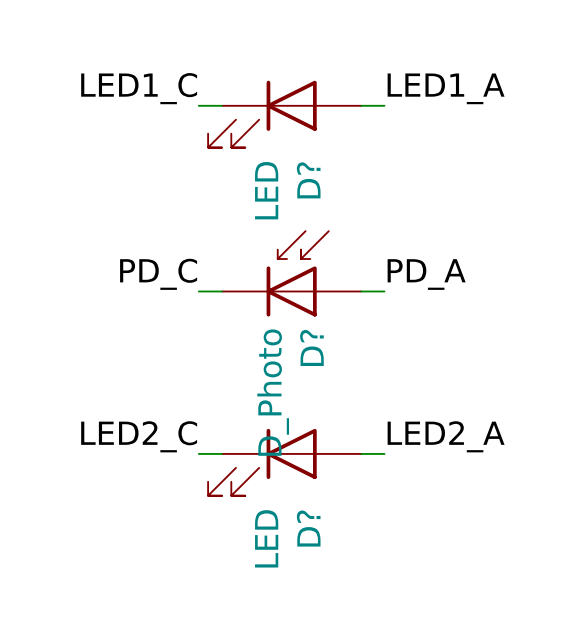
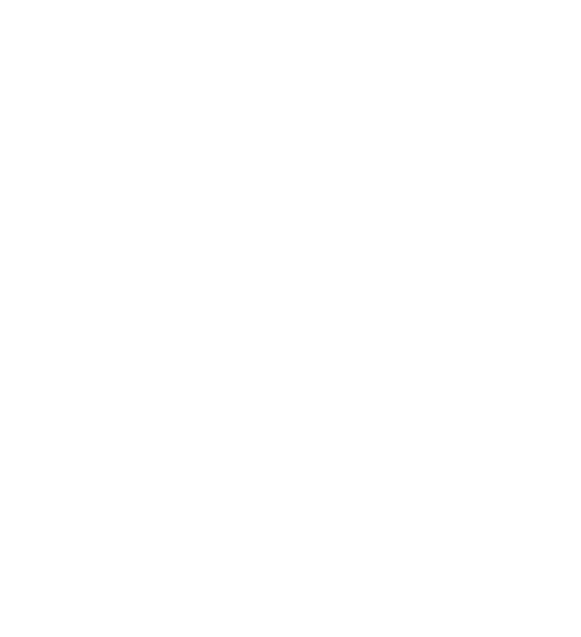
label: LED1_C (139, 88) -> none
label: LED1_A (446, 88) -> none
wire: (198, 105) (222, 105) -> none
wire: (361, 105) (384, 105) -> none
D?: LED (284, 114) -> none
D?: D_Photo (291, 273) -> none
label: PD_C (158, 274) -> none
label: PD_A (426, 274) -> none
wire: (198, 291) (222, 291) -> none
wire: (361, 291) (384, 291) -> none
label: LED2_C (139, 436) -> none
label: LED2_A (446, 436) -> none
wire: (198, 453) (222, 453) -> none
wire: (361, 453) (384, 453) -> none
D?: LED (284, 462) -> none

